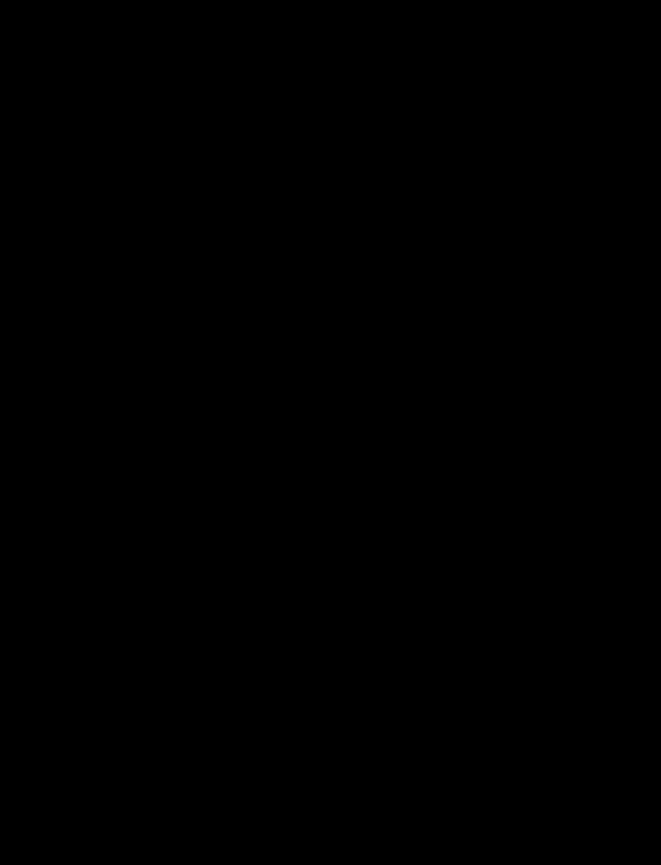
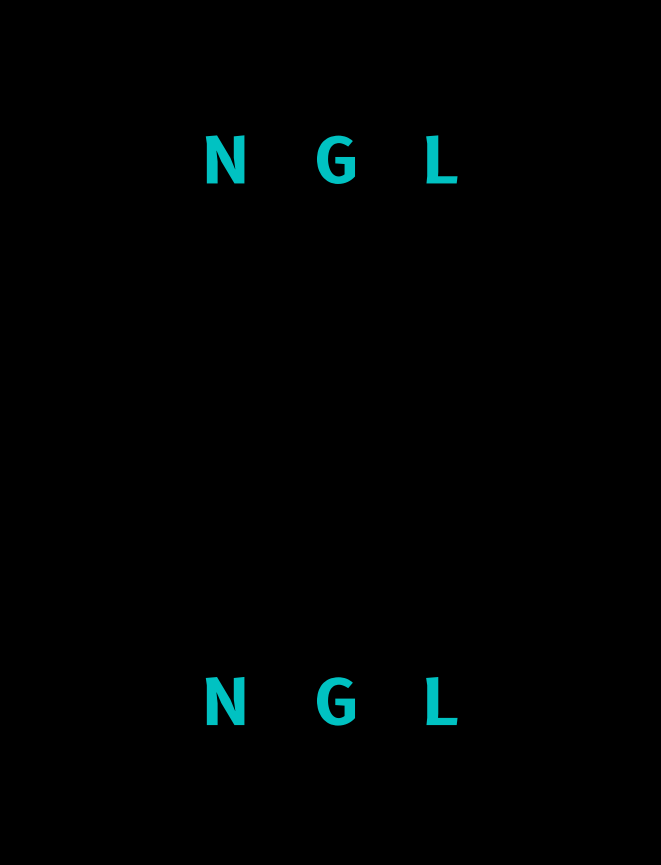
text: none -> N G L (331, 159)
text: none -> N G L (331, 701)

